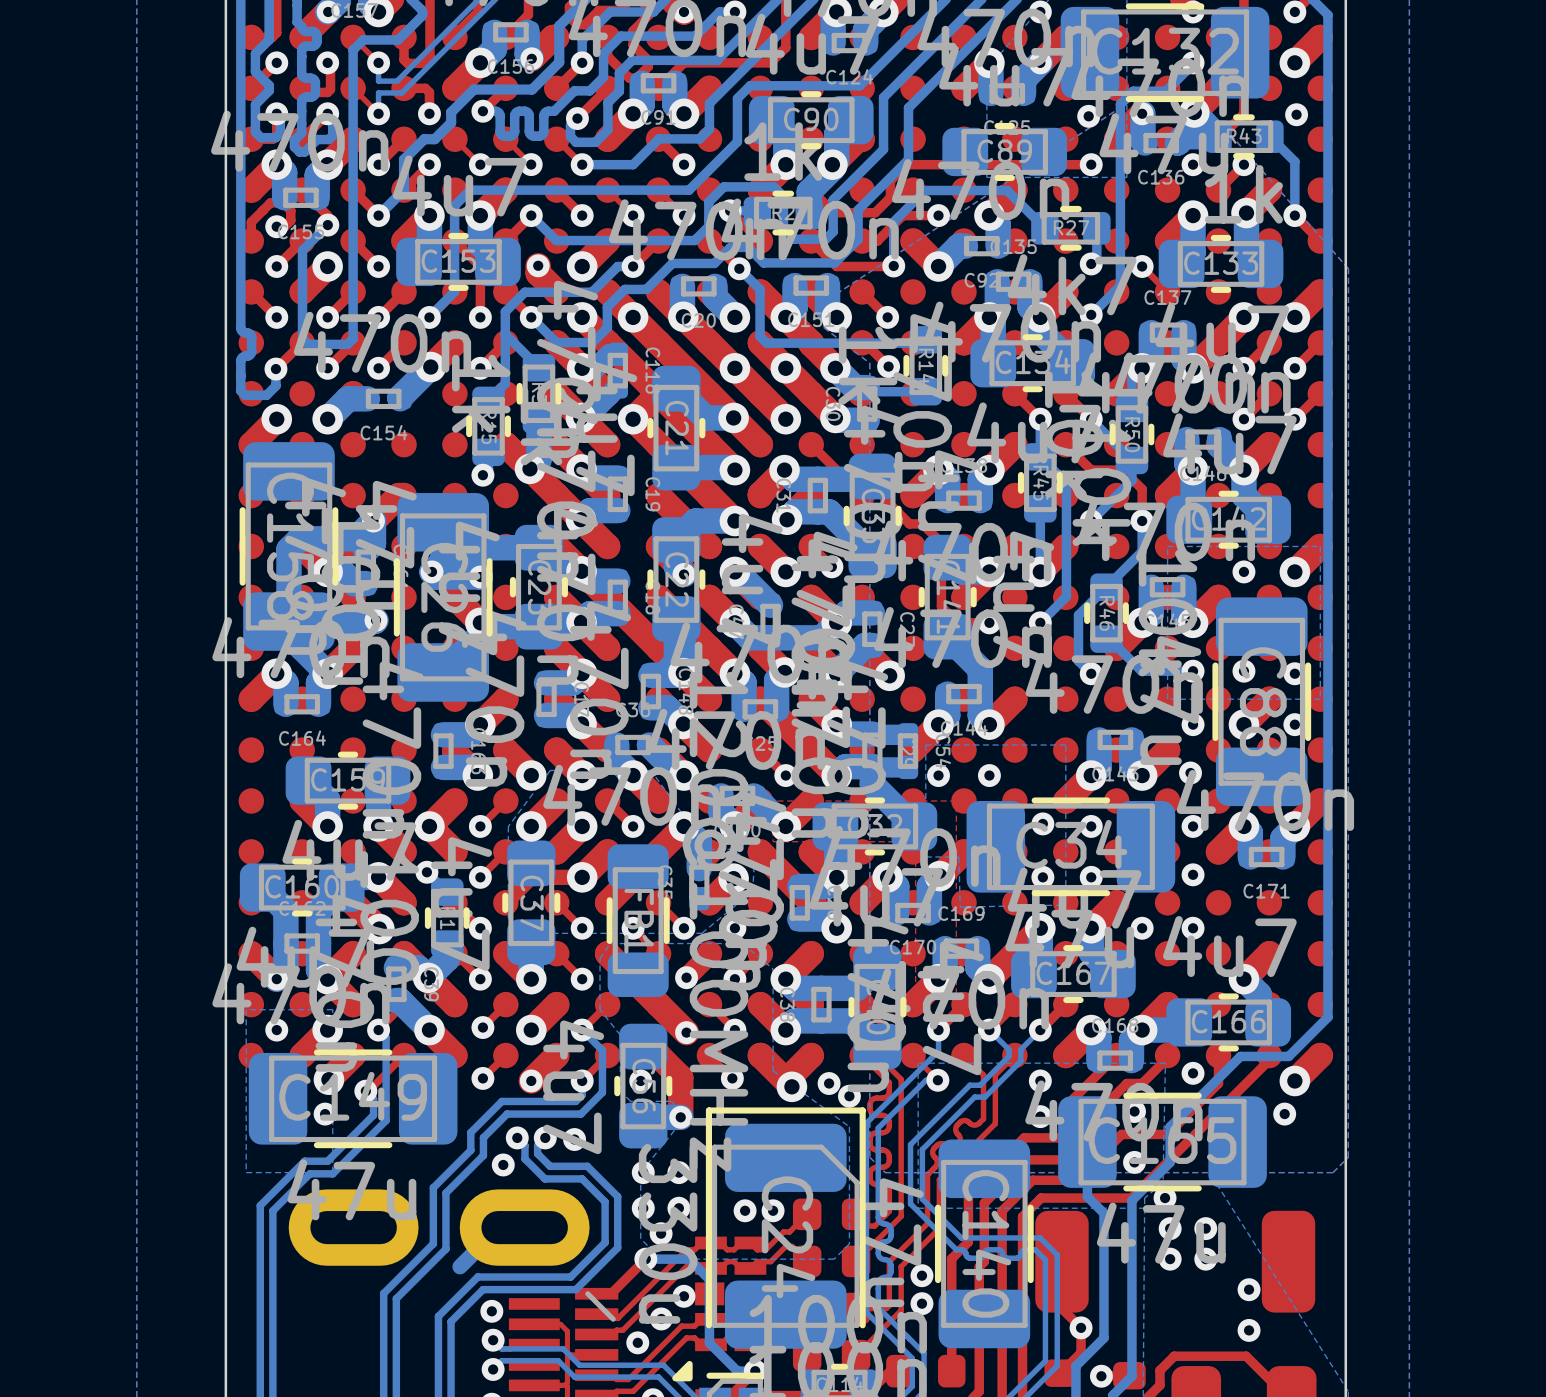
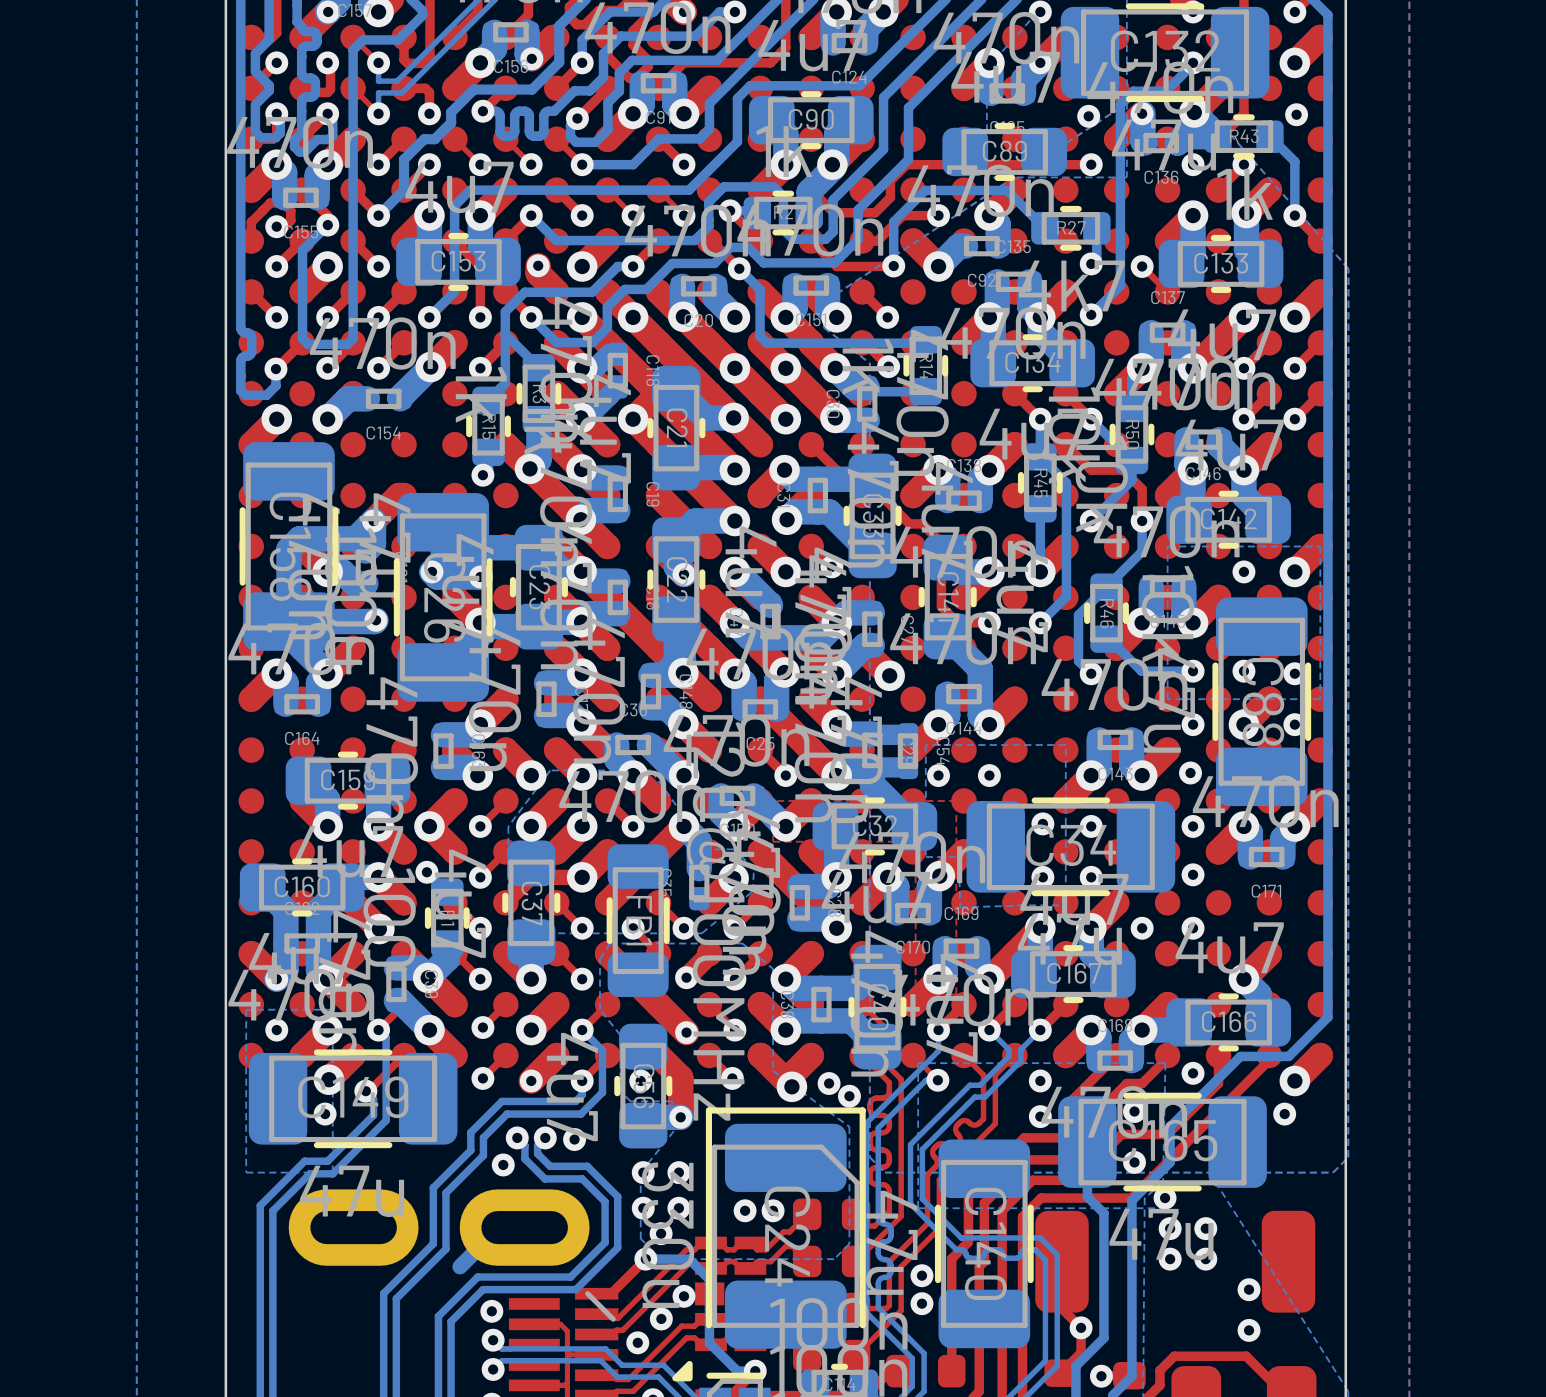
bottom track: (563, 1348) (579, 1365) (622, 1365) -> (563, 1348) (605, 1348) (622, 1365)
bottom track: (558, 1360) (574, 1377) (617, 1377) -> (558, 1360) (600, 1360) (617, 1377)

